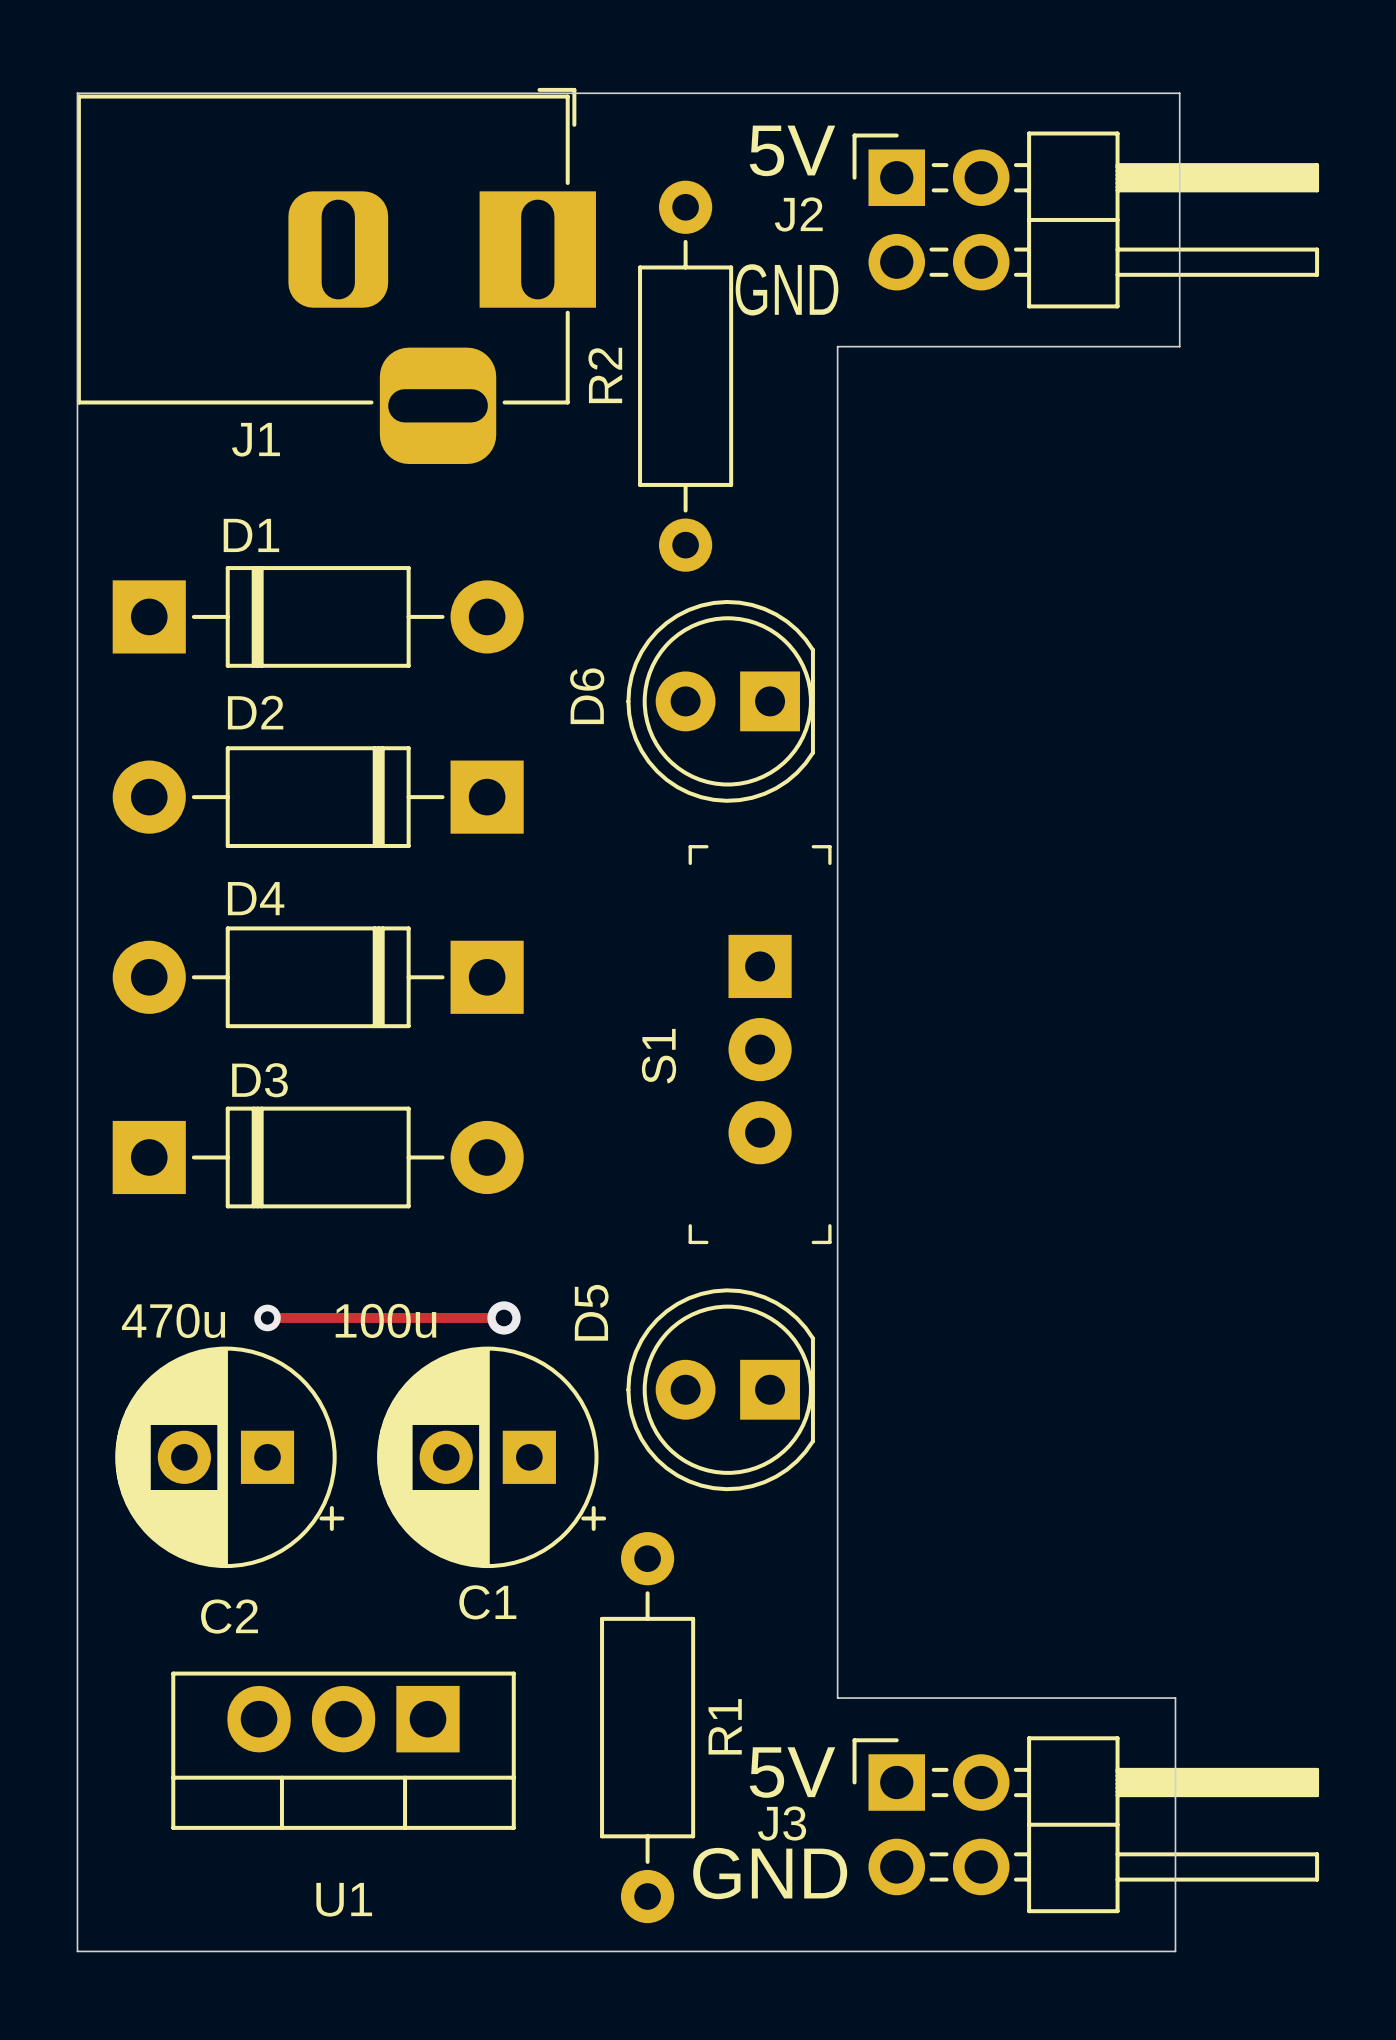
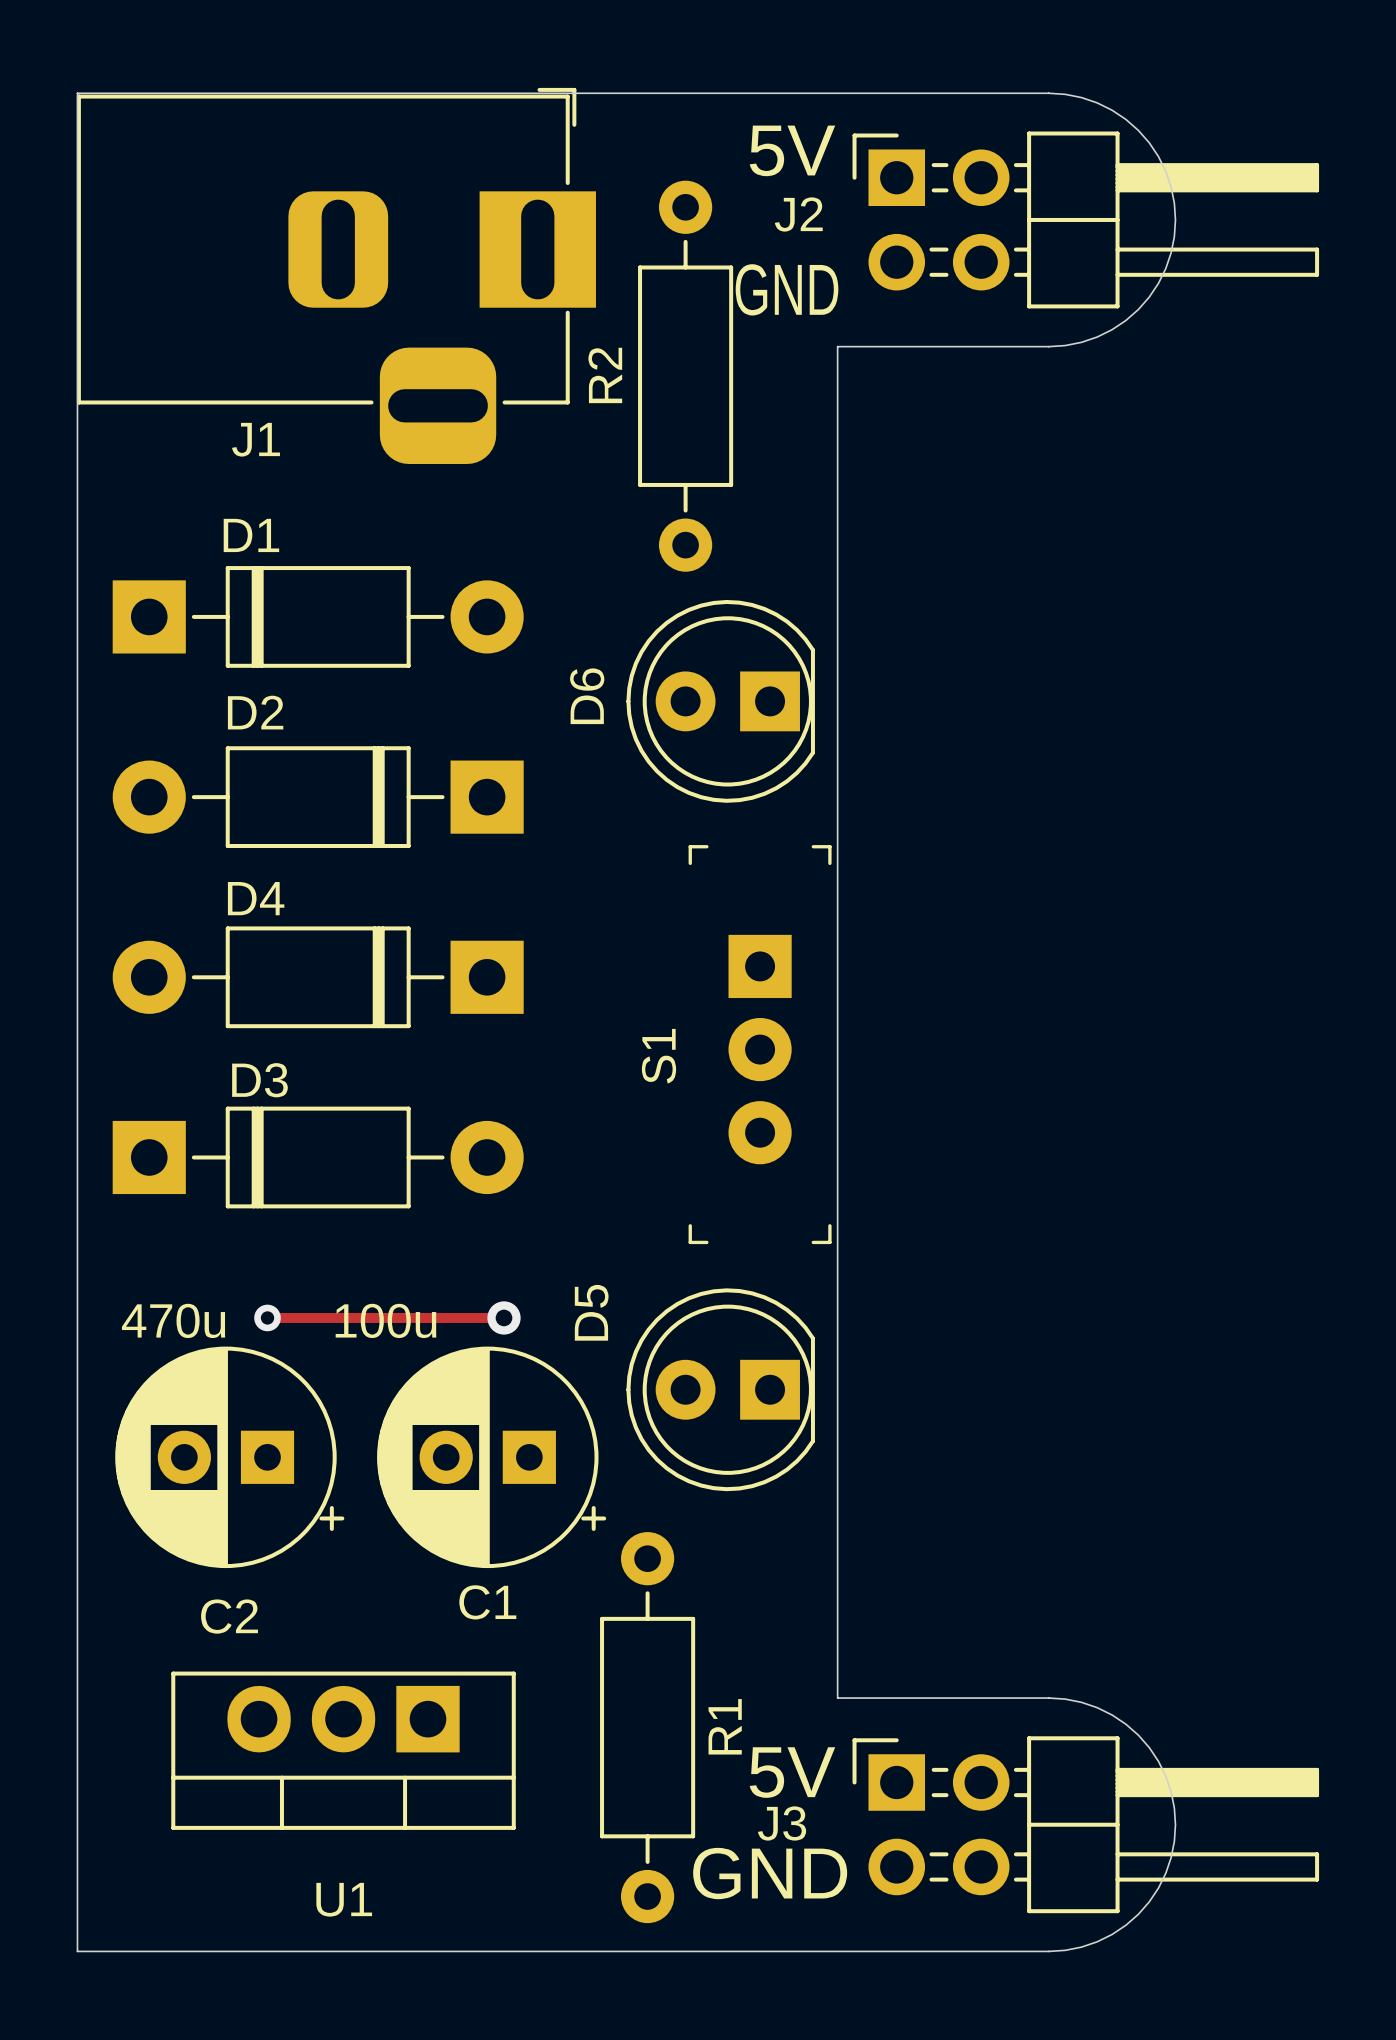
board edge: (1048, 93) (1179, 93) (1179, 346) (1048, 346) -> (1048, 93) (1065, 94) (1097, 102) (1112, 110) (1138, 130) (1158, 156) (1165, 171) (1174, 203) (1175, 219) (1174, 236) (1165, 268) (1158, 283) (1138, 309) (1112, 329) (1097, 337) (1065, 345) (1048, 346)
board edge: (1048, 1698) (1175, 1698) (1175, 1951) (1048, 1951) -> (1048, 1698) (1065, 1699) (1097, 1707) (1112, 1715) (1138, 1735) (1158, 1761) (1165, 1776) (1174, 1808) (1175, 1824) (1174, 1841) (1165, 1873) (1158, 1888) (1138, 1914) (1112, 1934) (1097, 1941) (1065, 1950) (1048, 1951)

